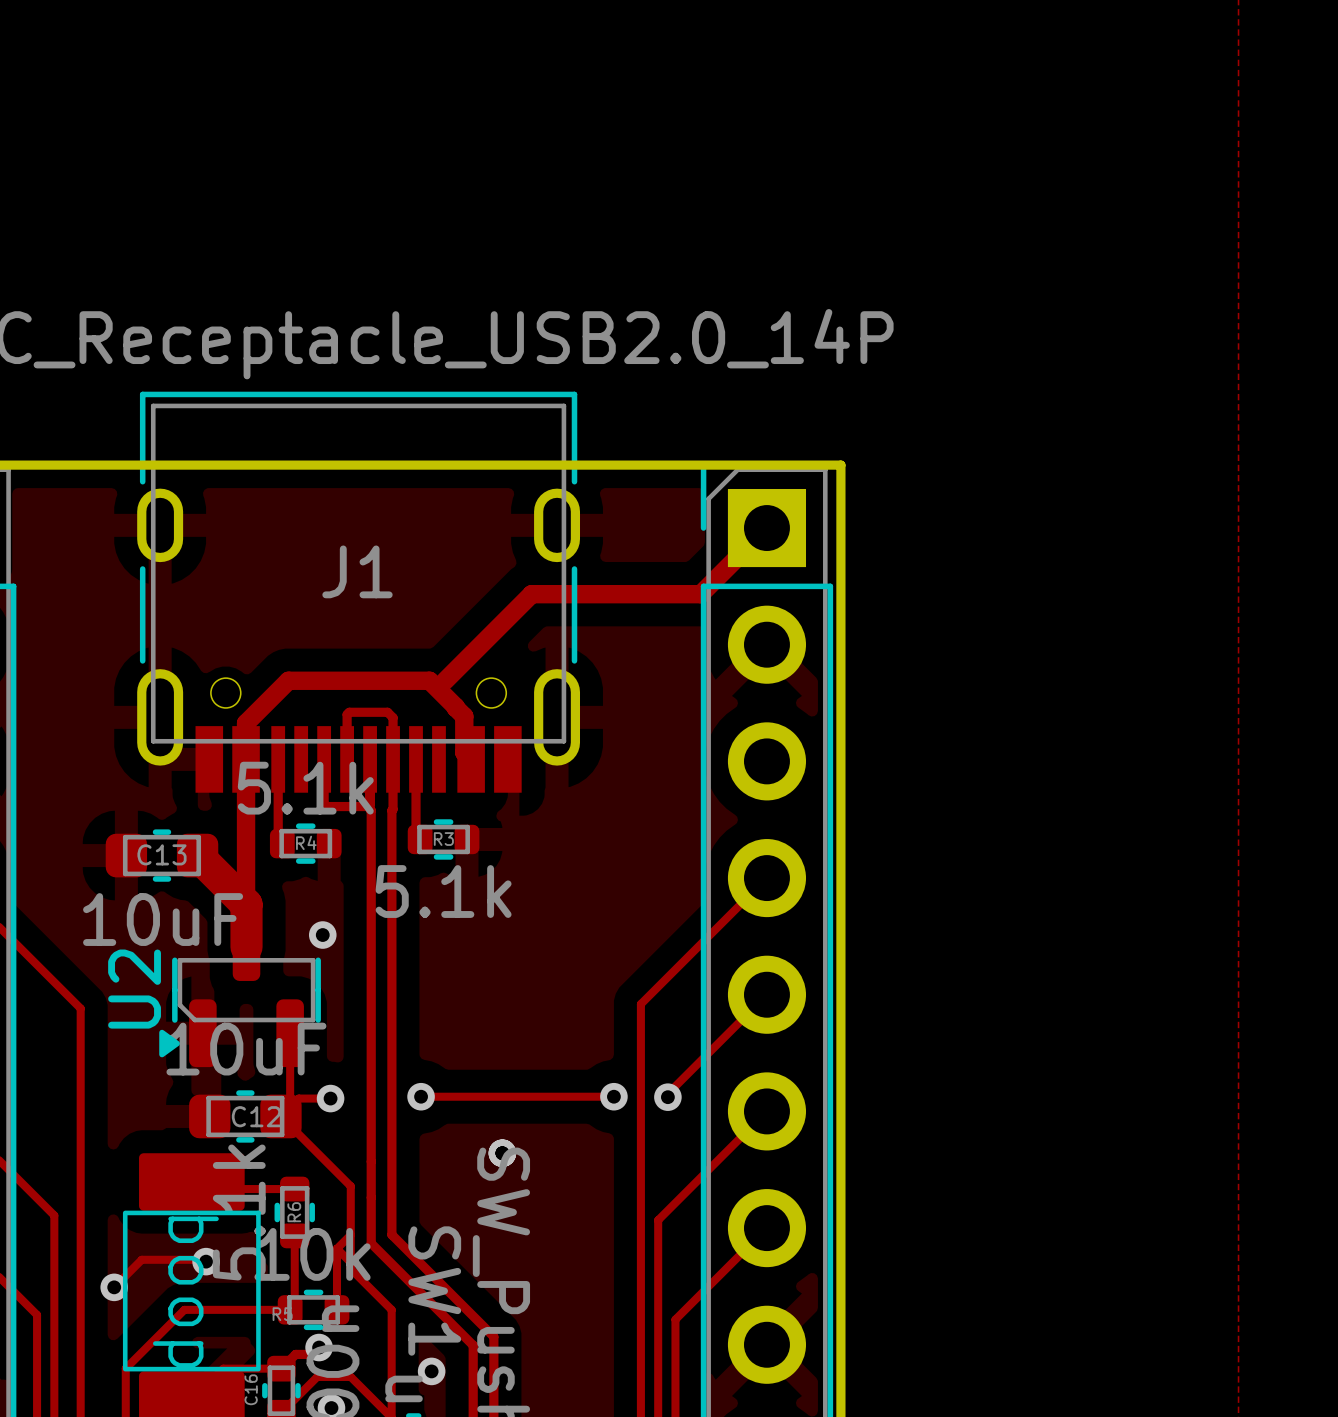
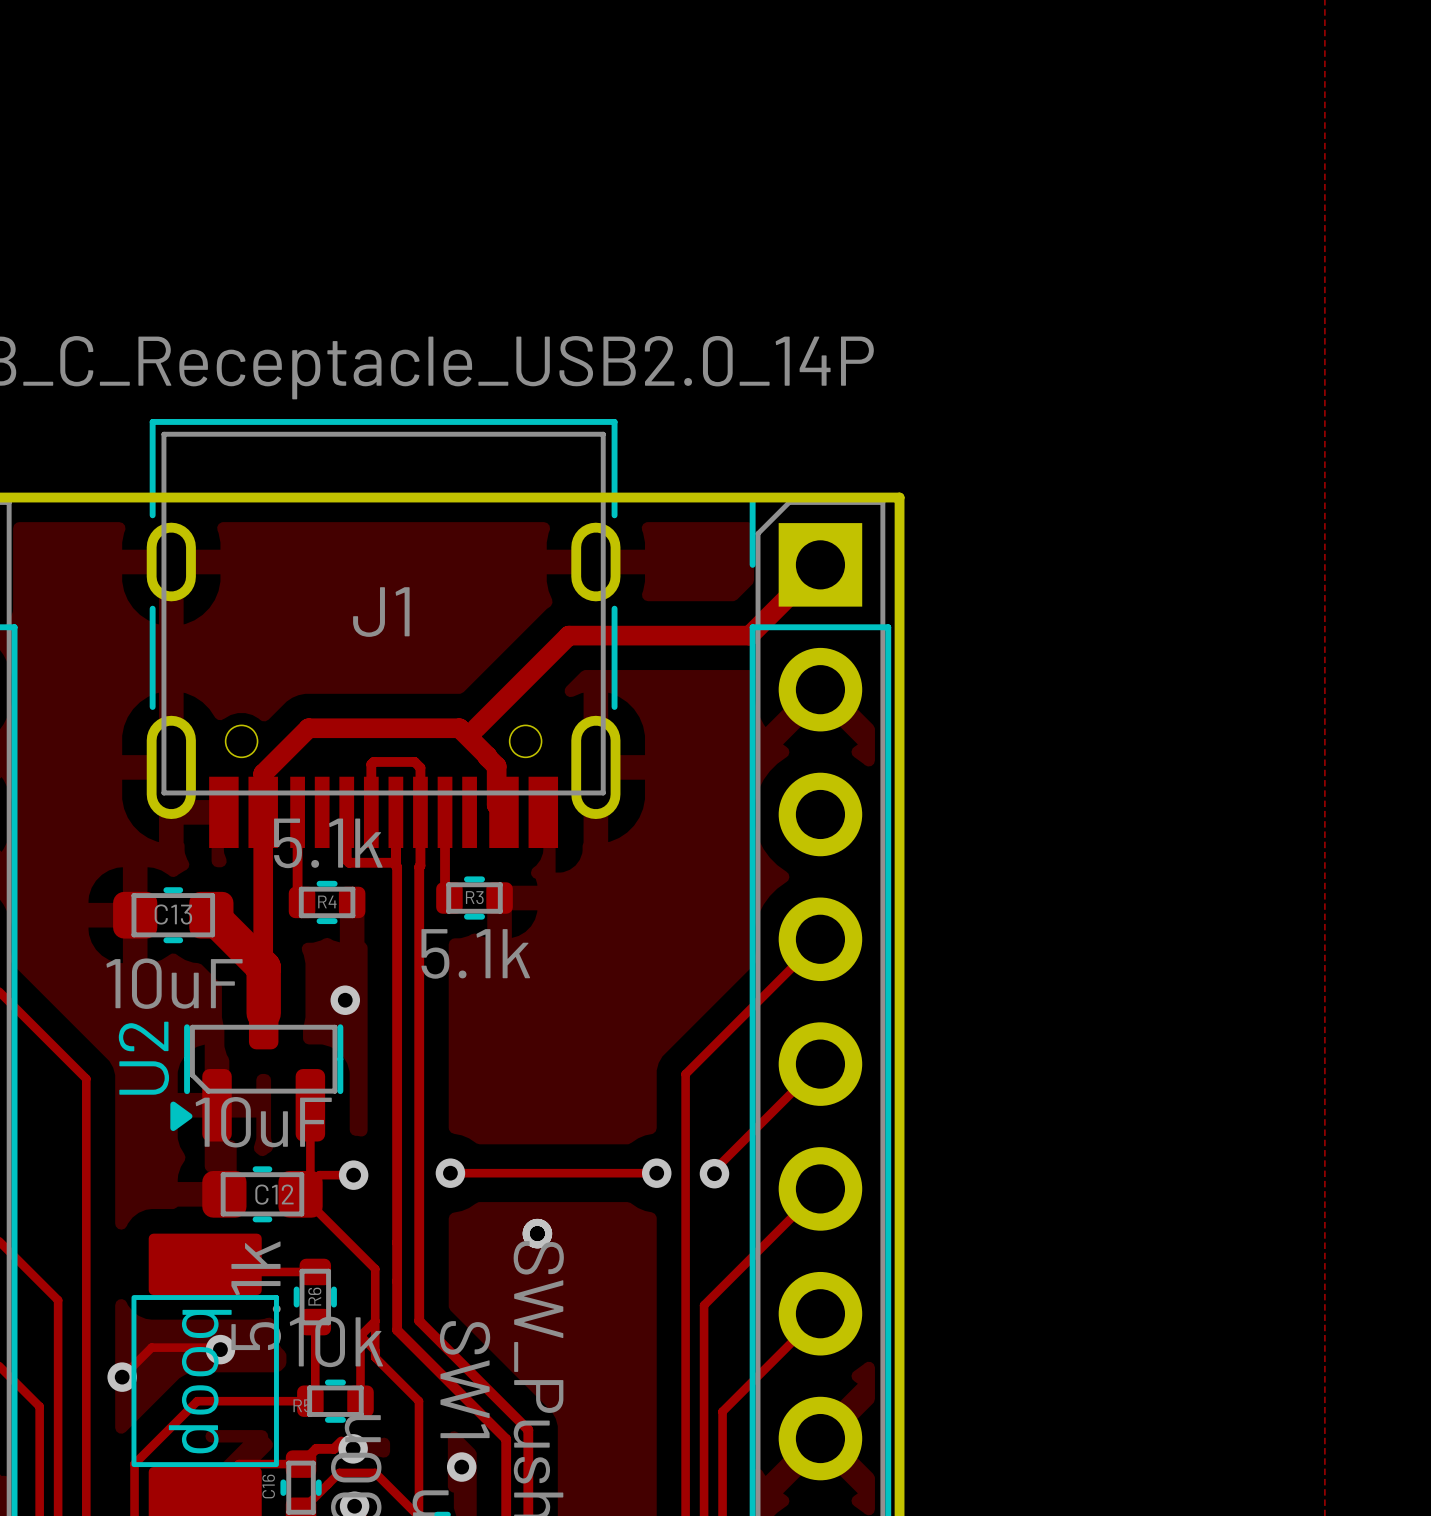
via position: (319, 1347) -> (353, 1448)

